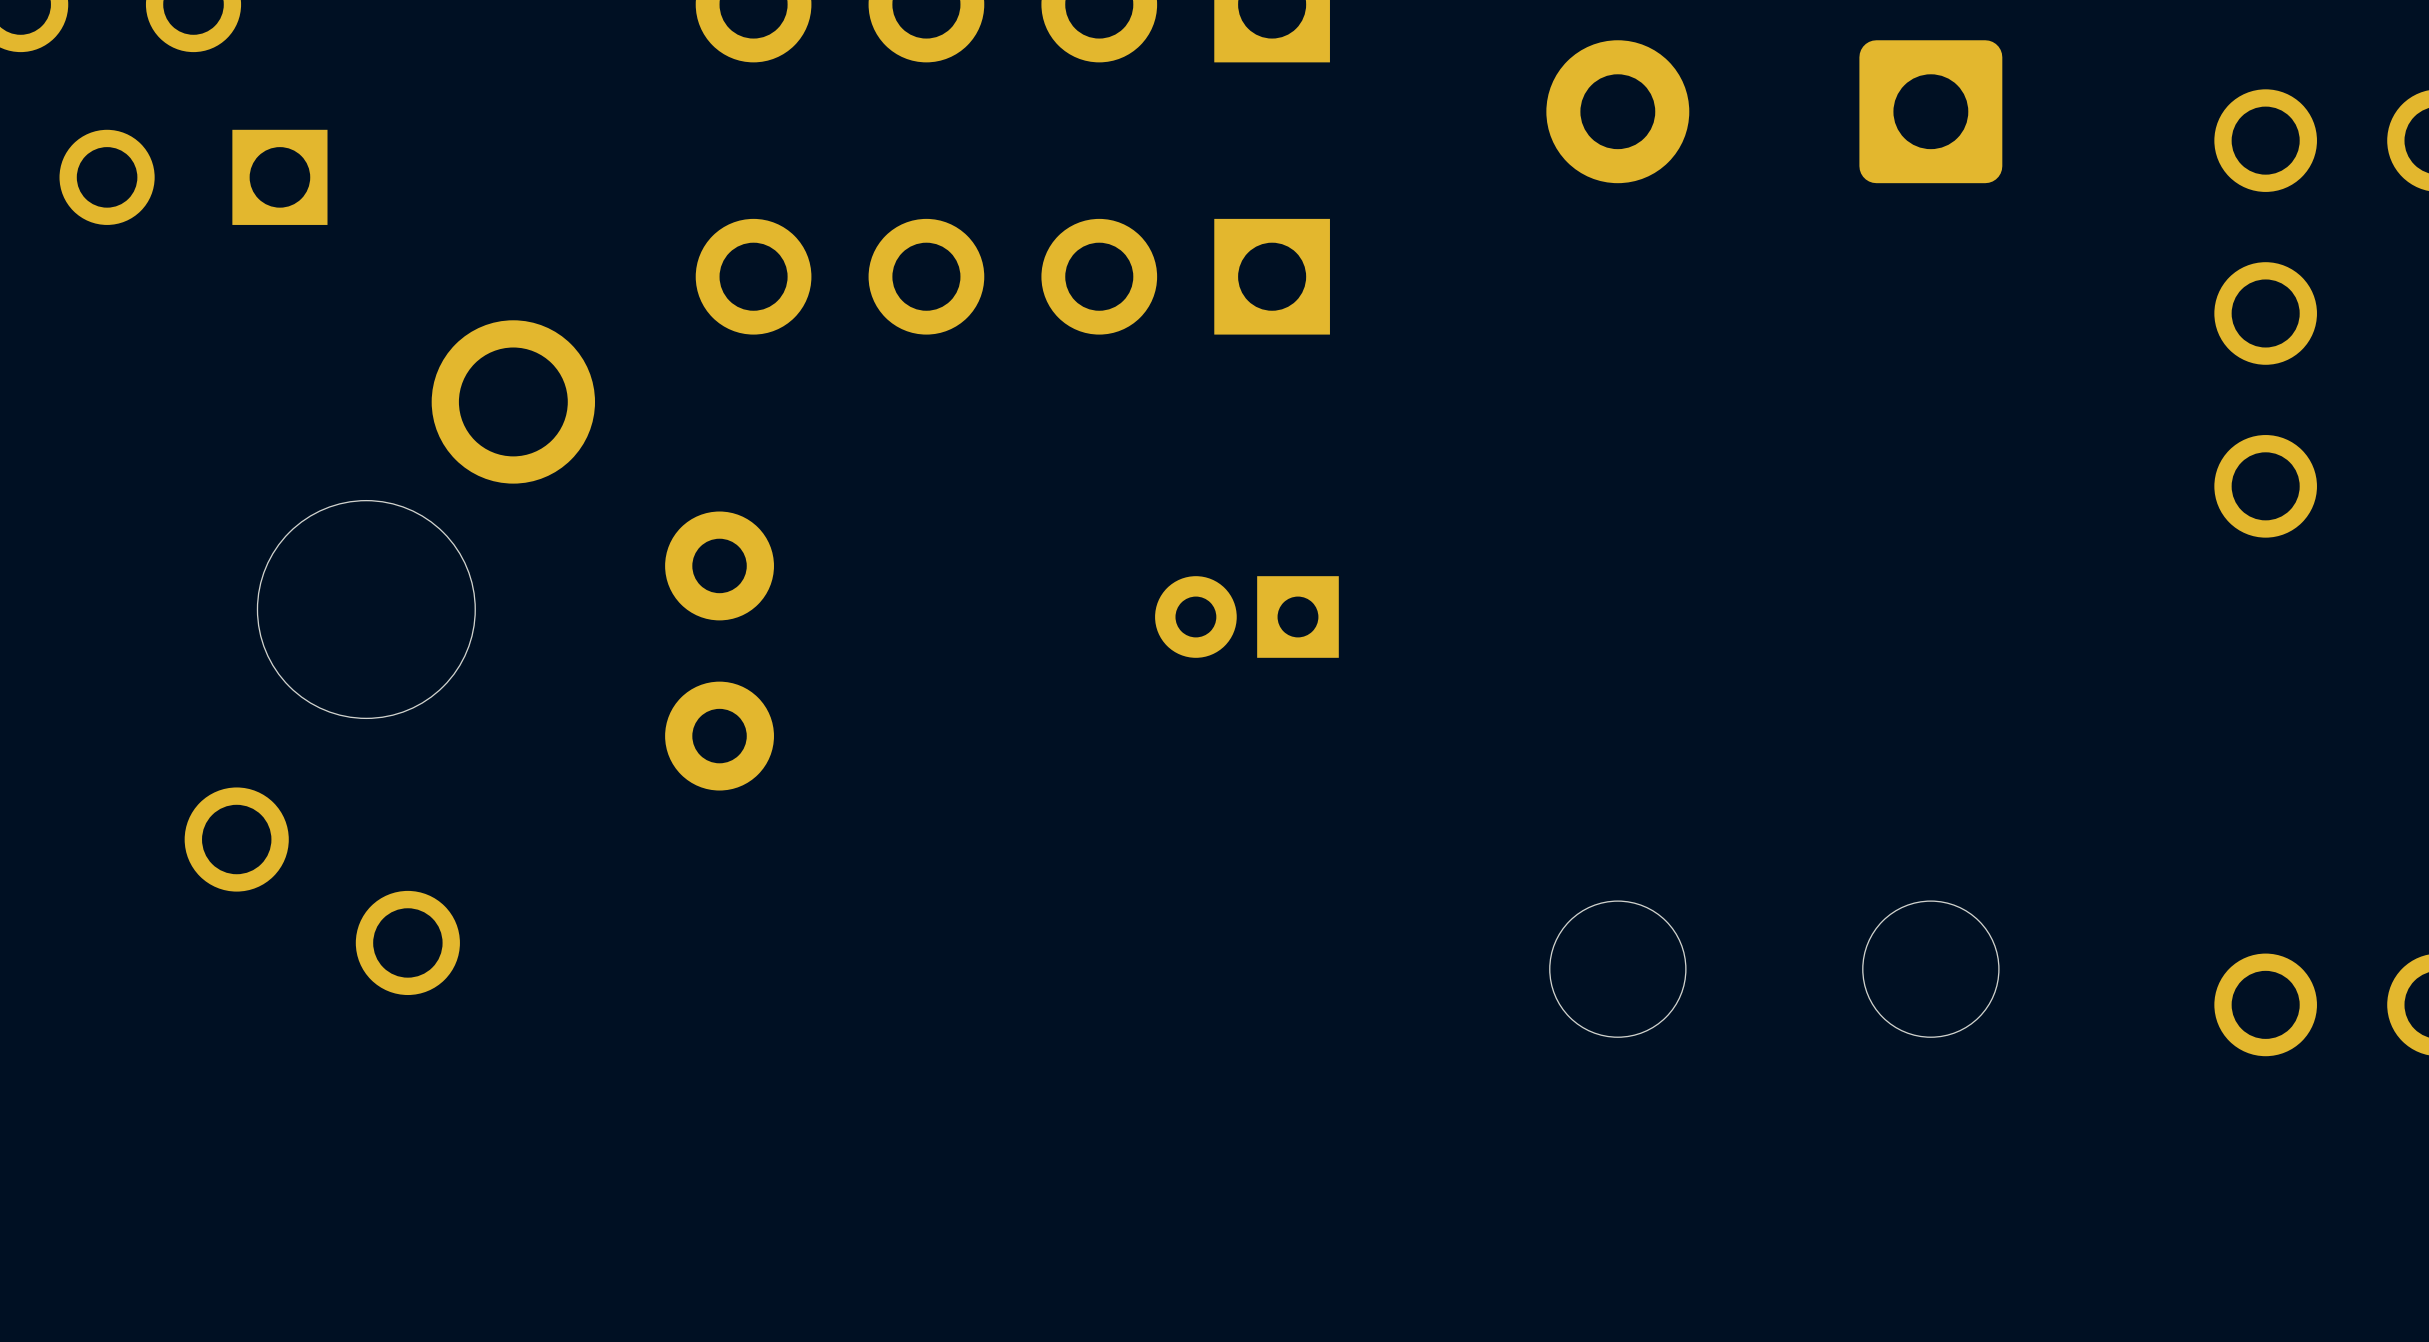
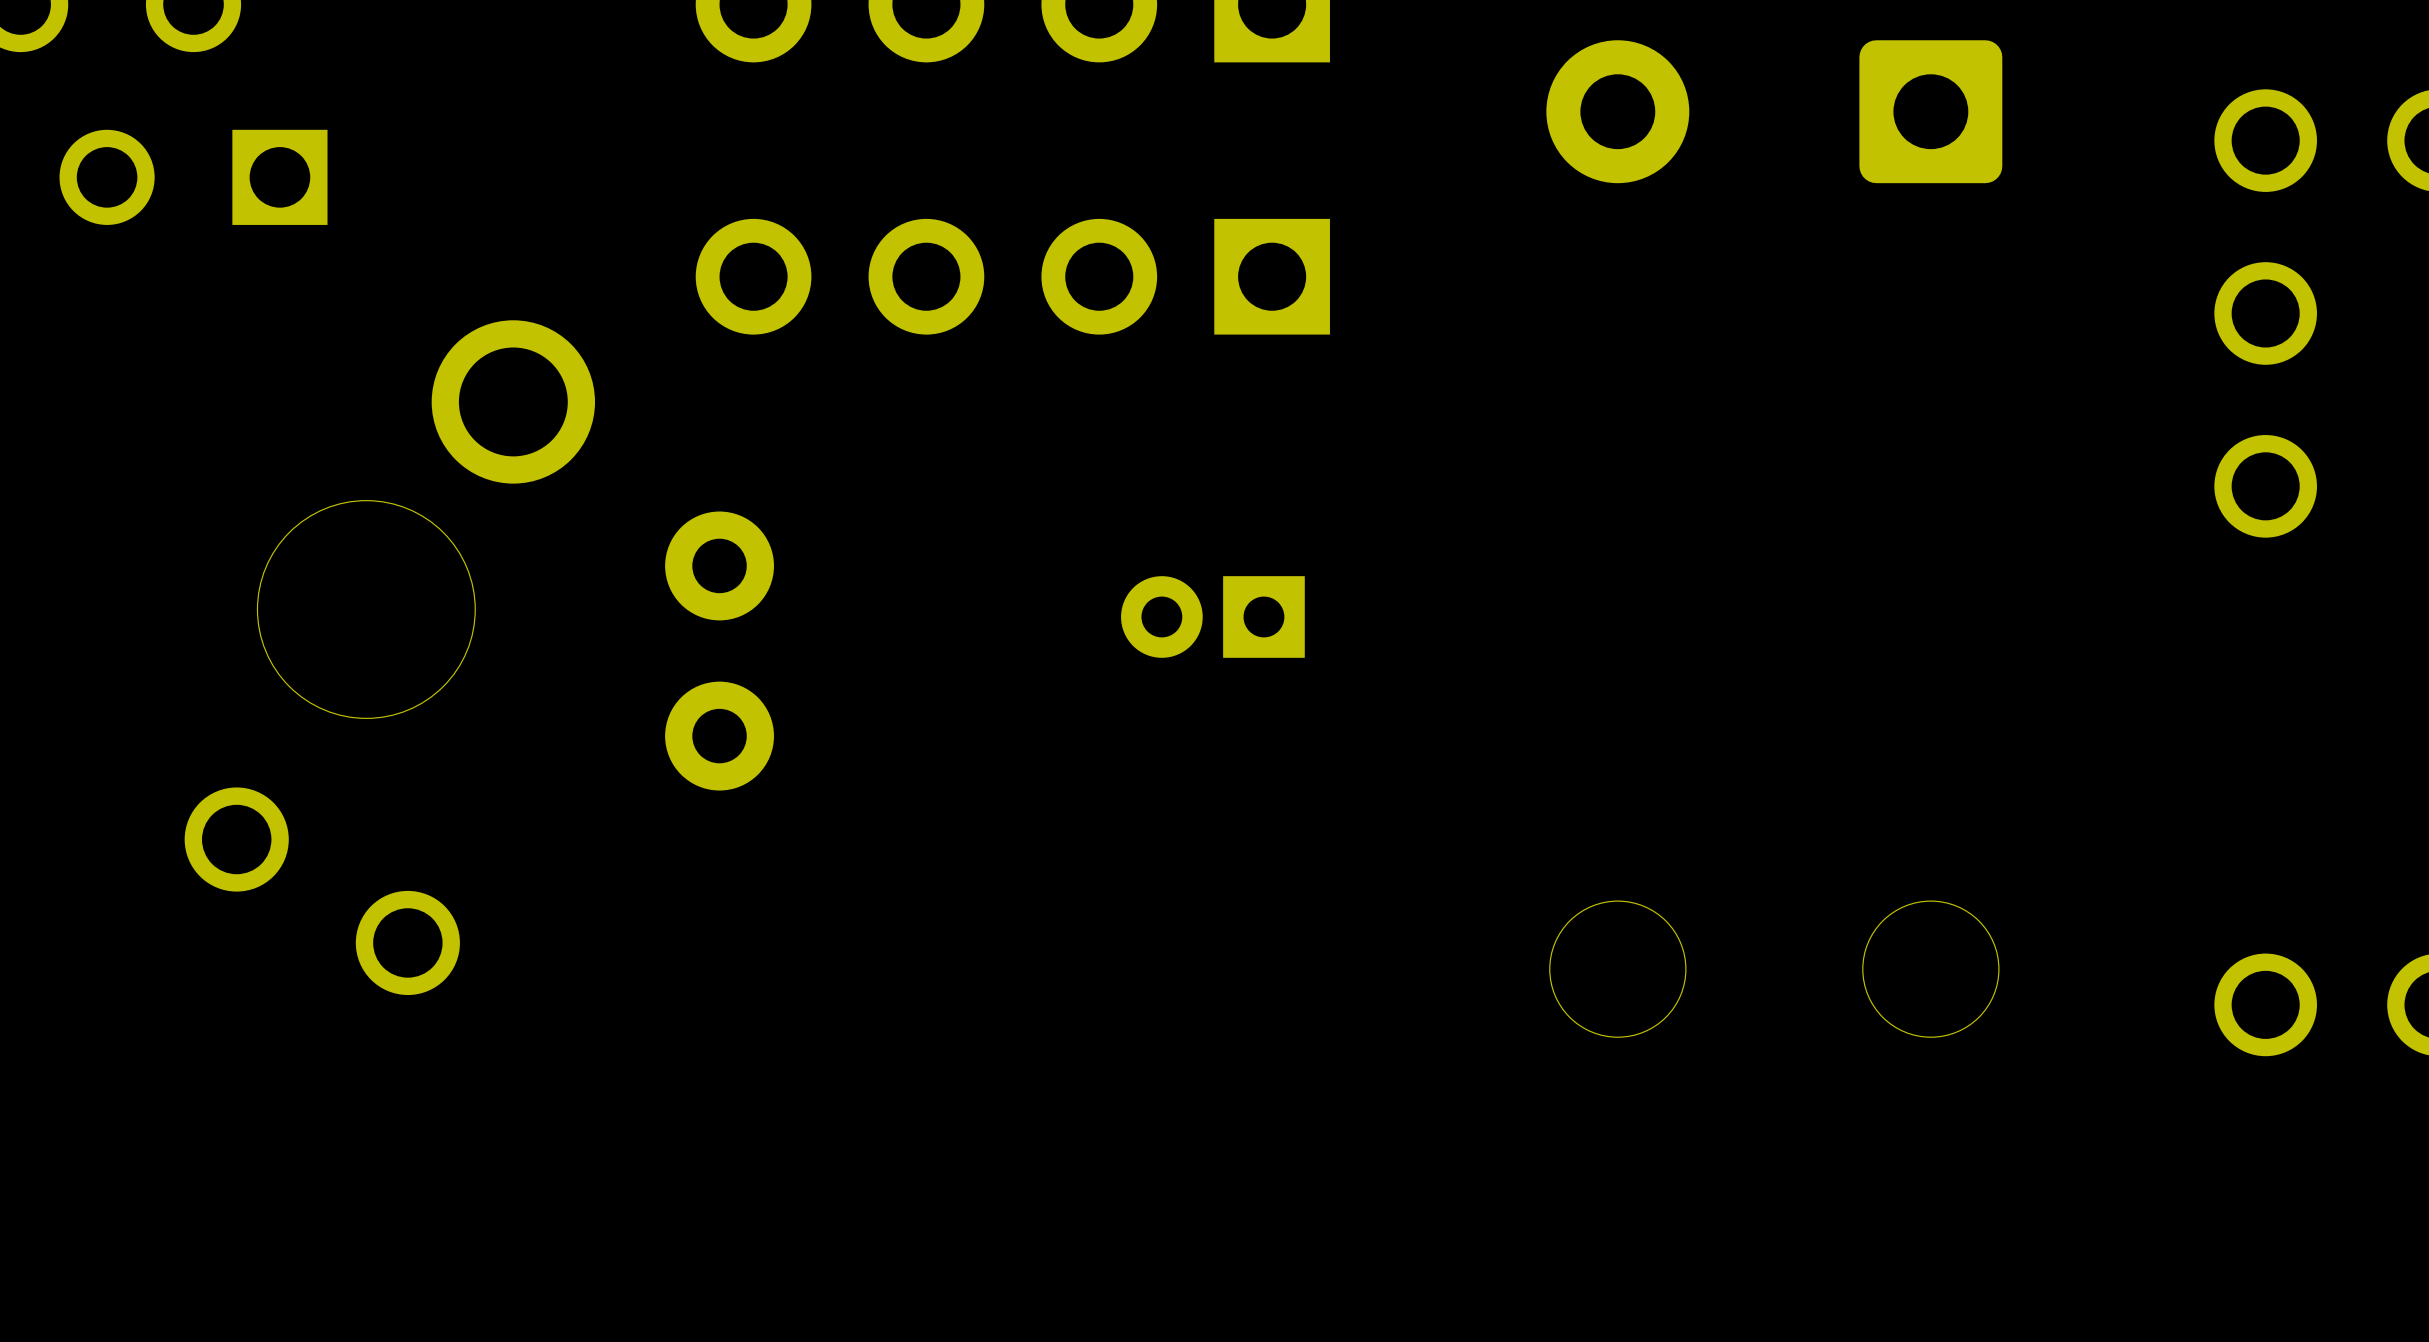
part position: (1246, 616) -> (1212, 616)

